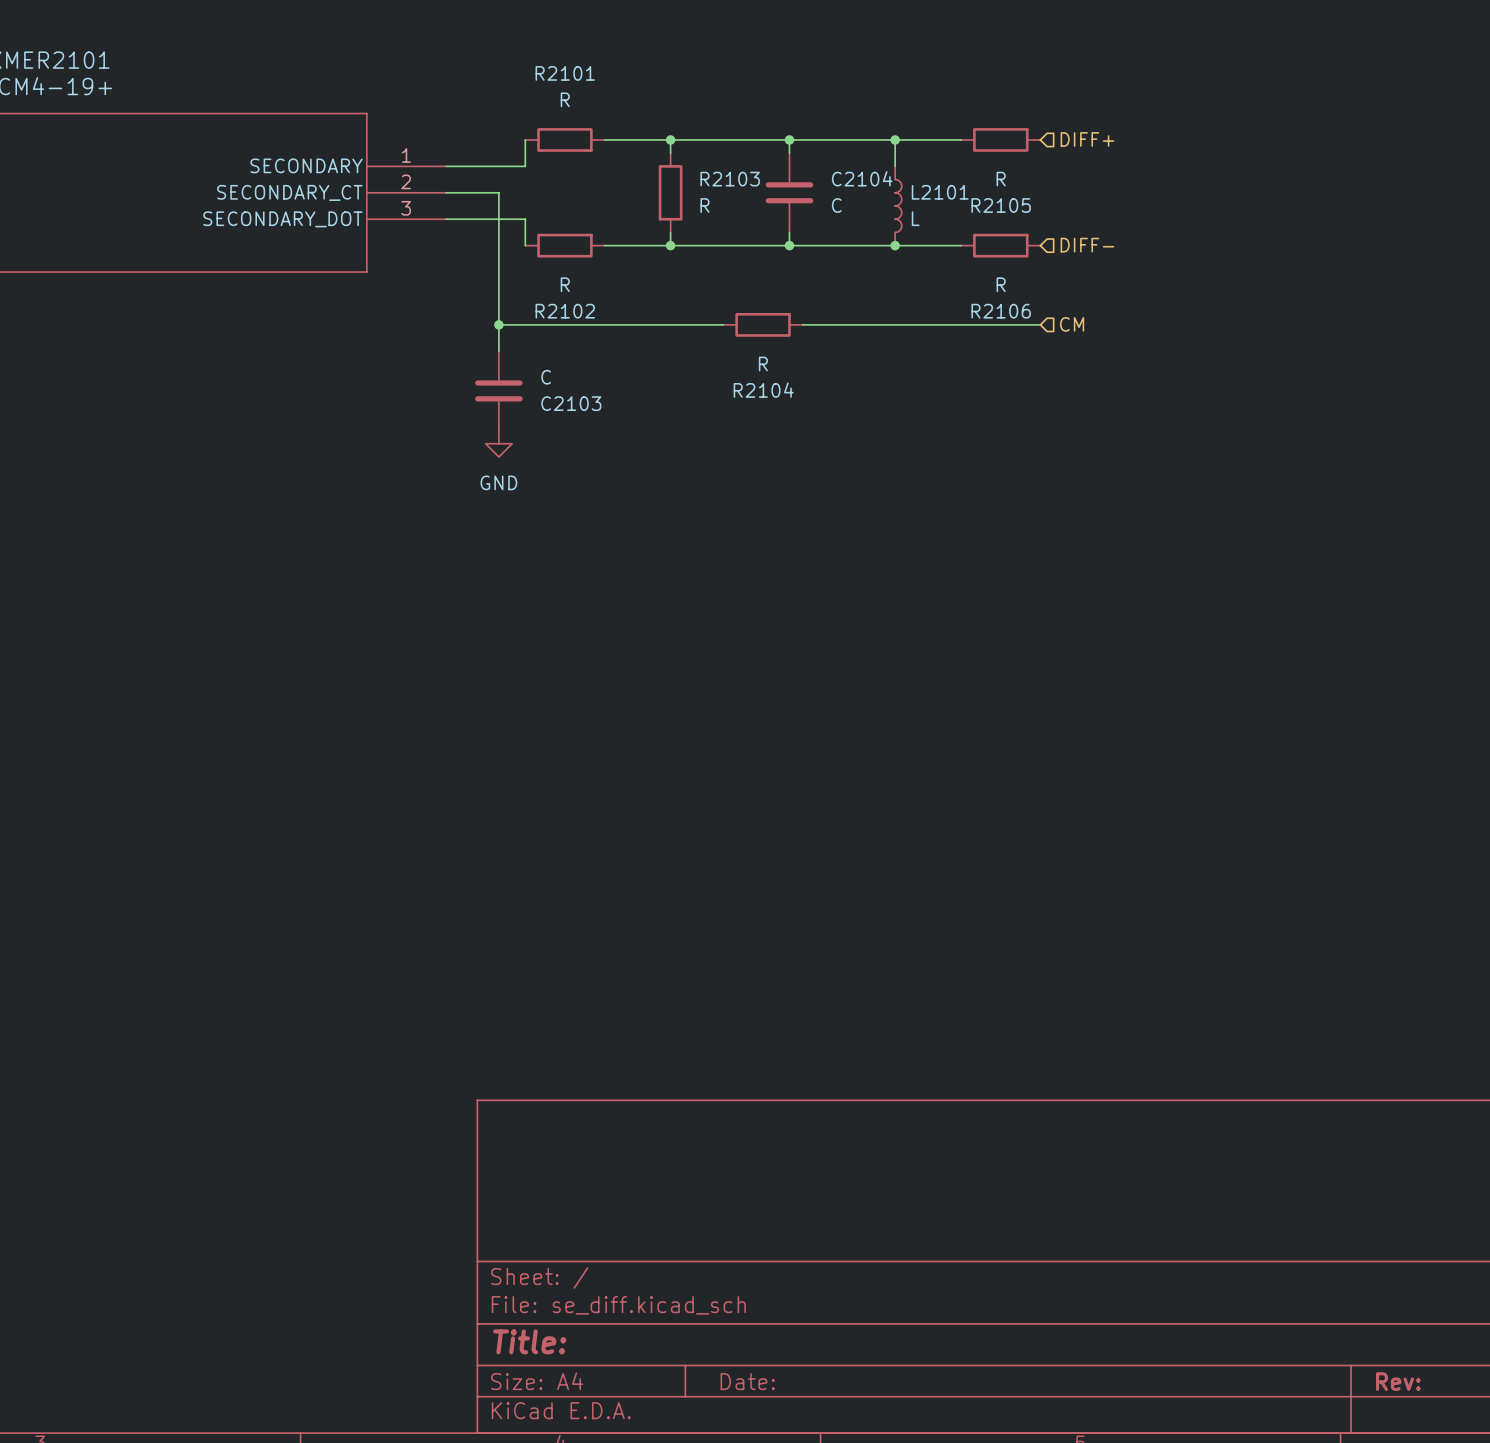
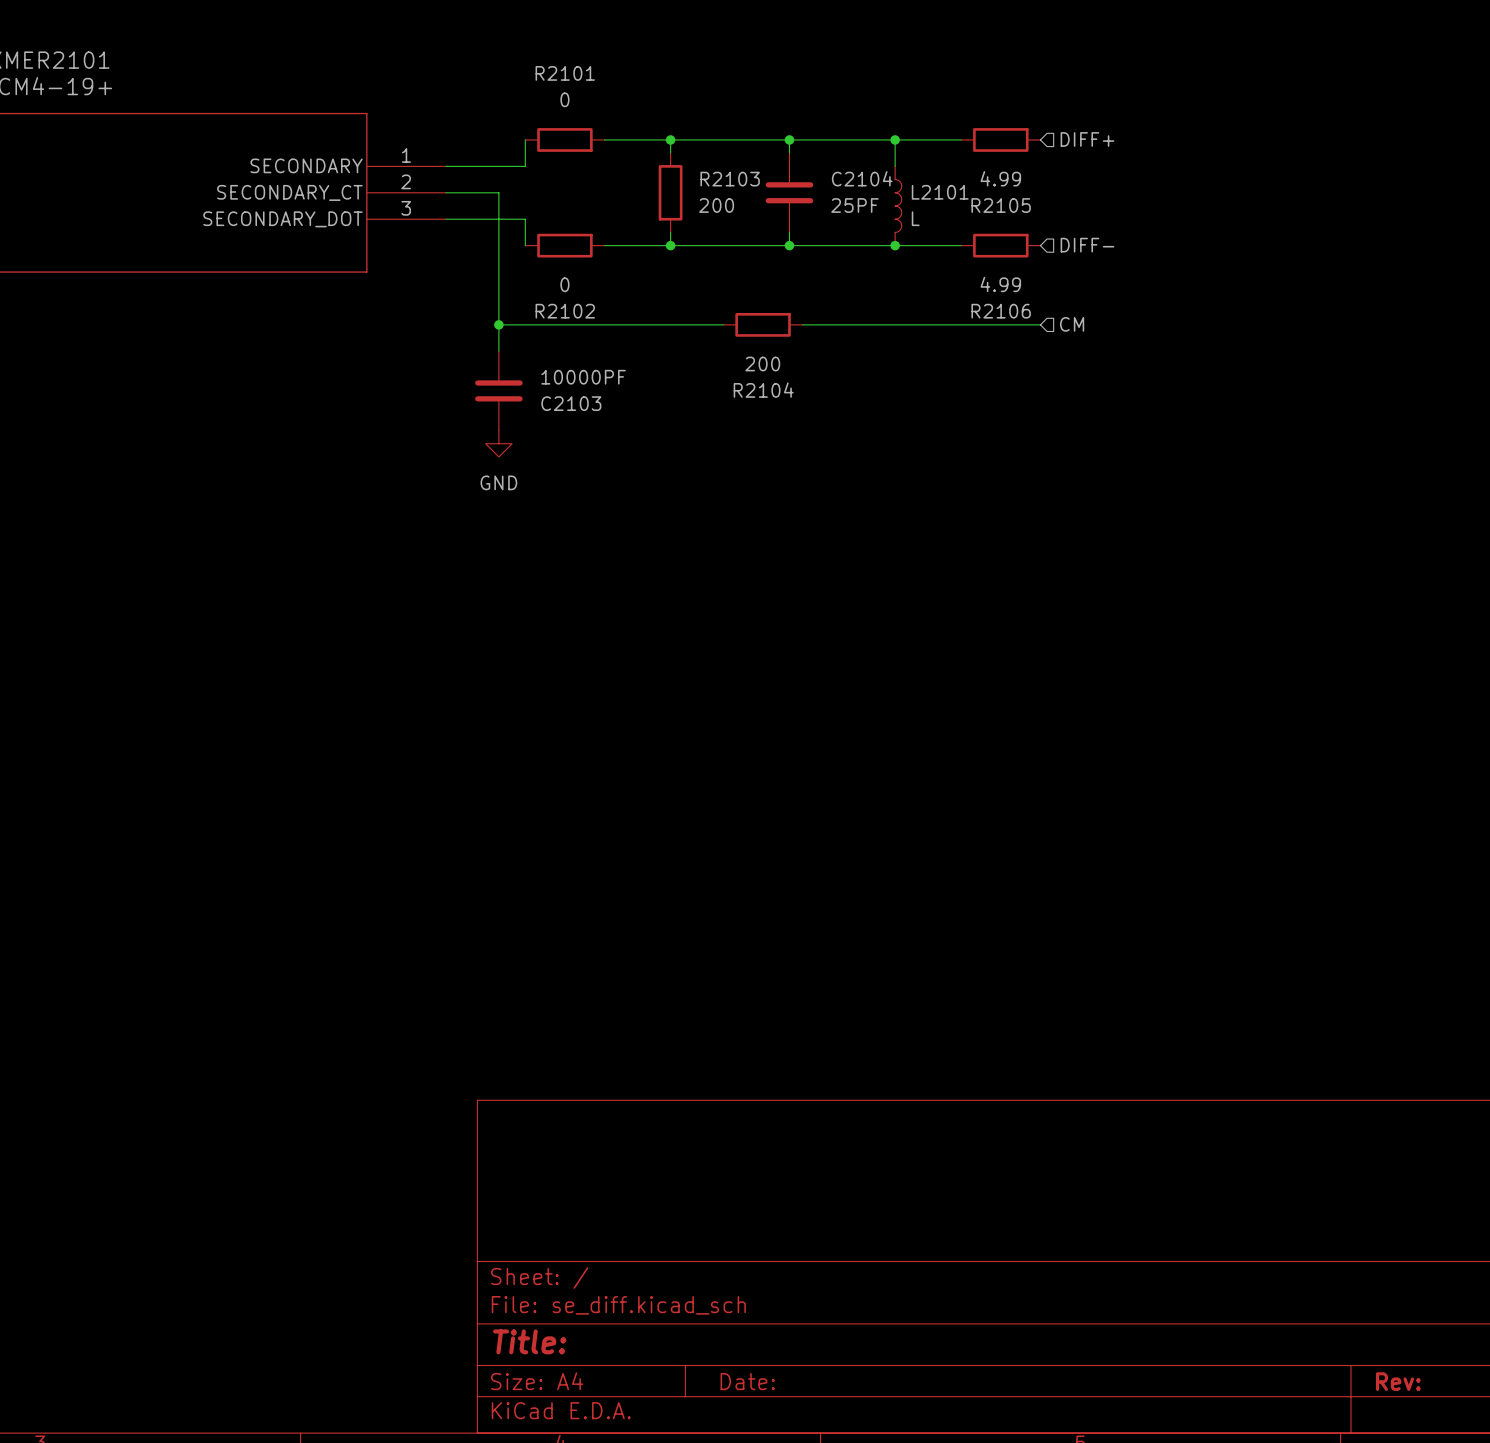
R2101 value: R (565, 99) -> 0 (564, 99)
R2105 value: R (1001, 179) -> 4.99 (1000, 178)
R2103 value: R (704, 205) -> 200 (716, 205)
C2104 value: C (836, 205) -> 25PF (854, 205)
R2102 value: R (565, 284) -> 0 (564, 284)
R2106 value: R (1001, 284) -> 4.99 (1000, 284)
R2104 value: R (763, 364) -> 200 (762, 364)
C2103 value: C (546, 377) -> 10000PF (583, 377)

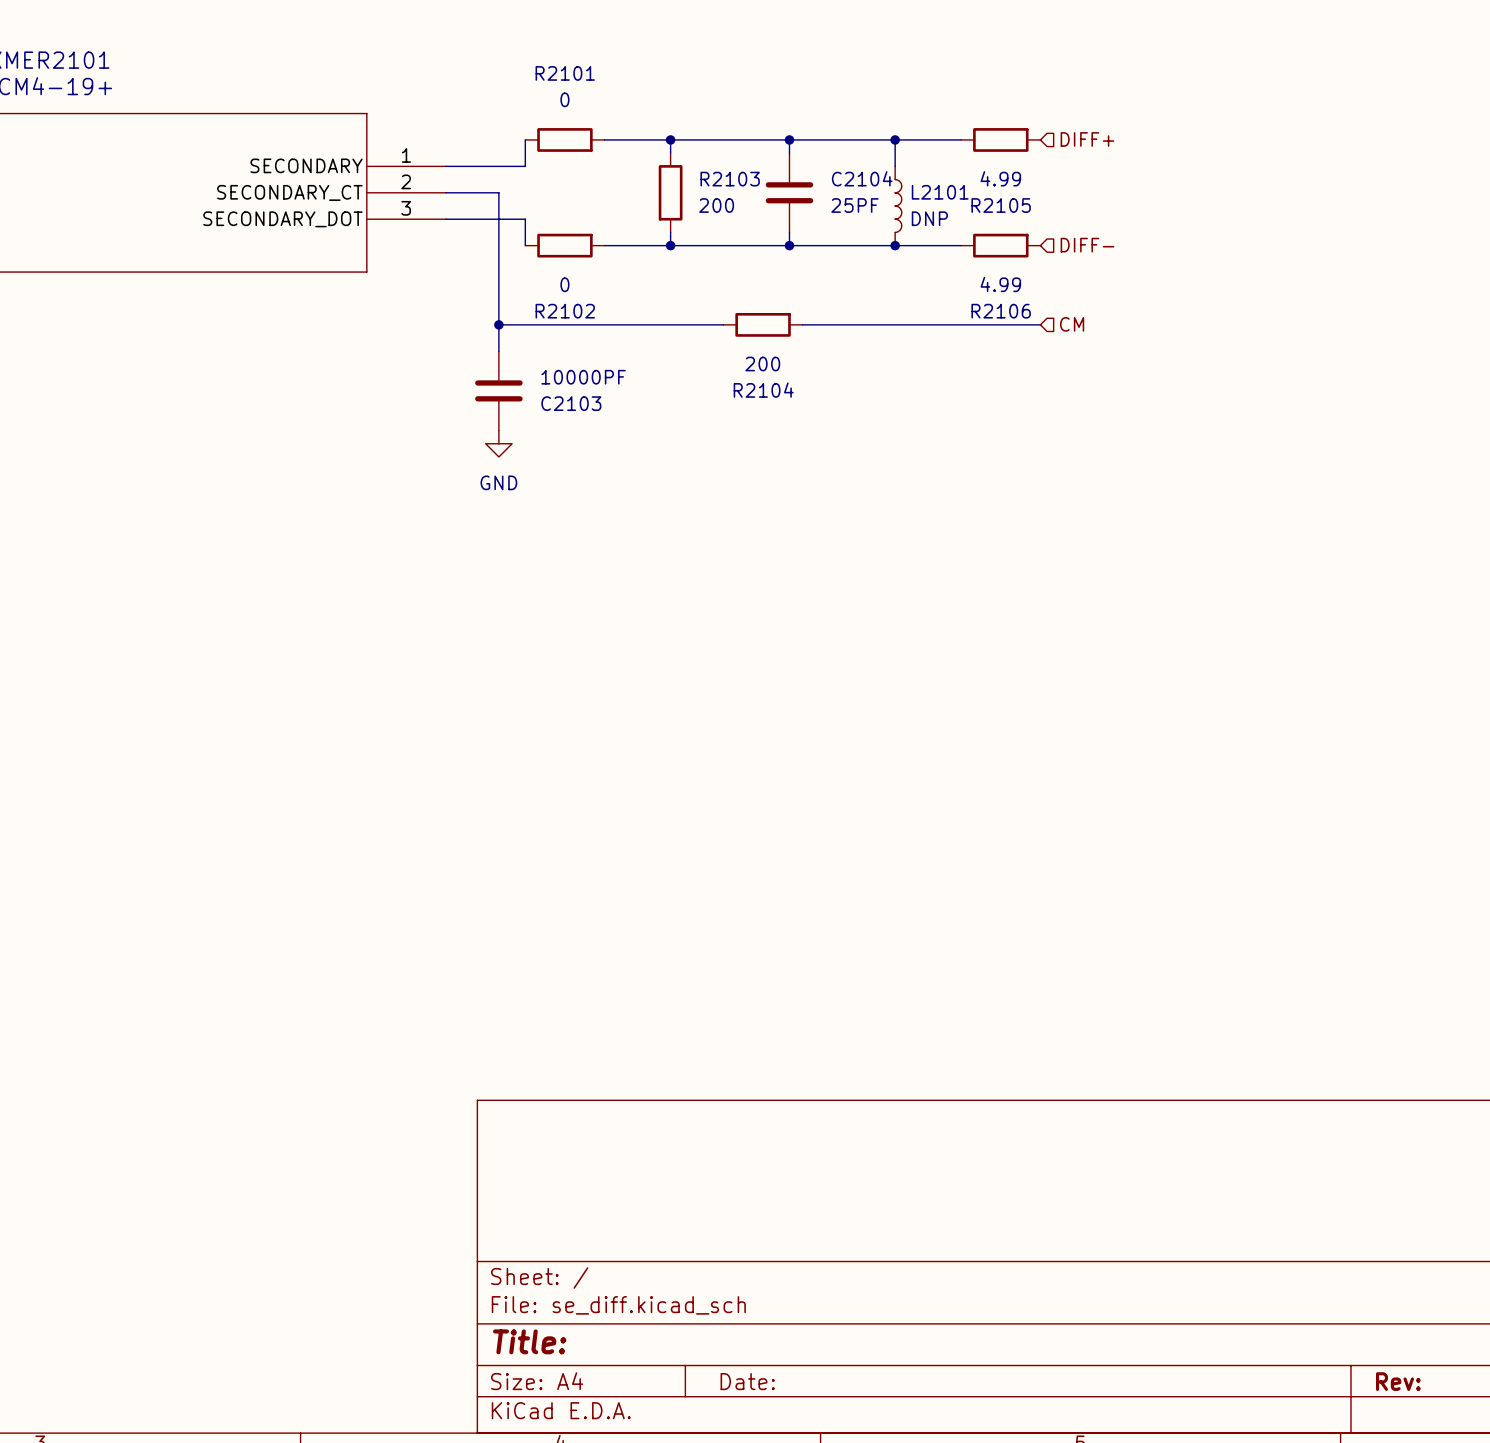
L2101 value: L (915, 218) -> DNP (929, 218)

